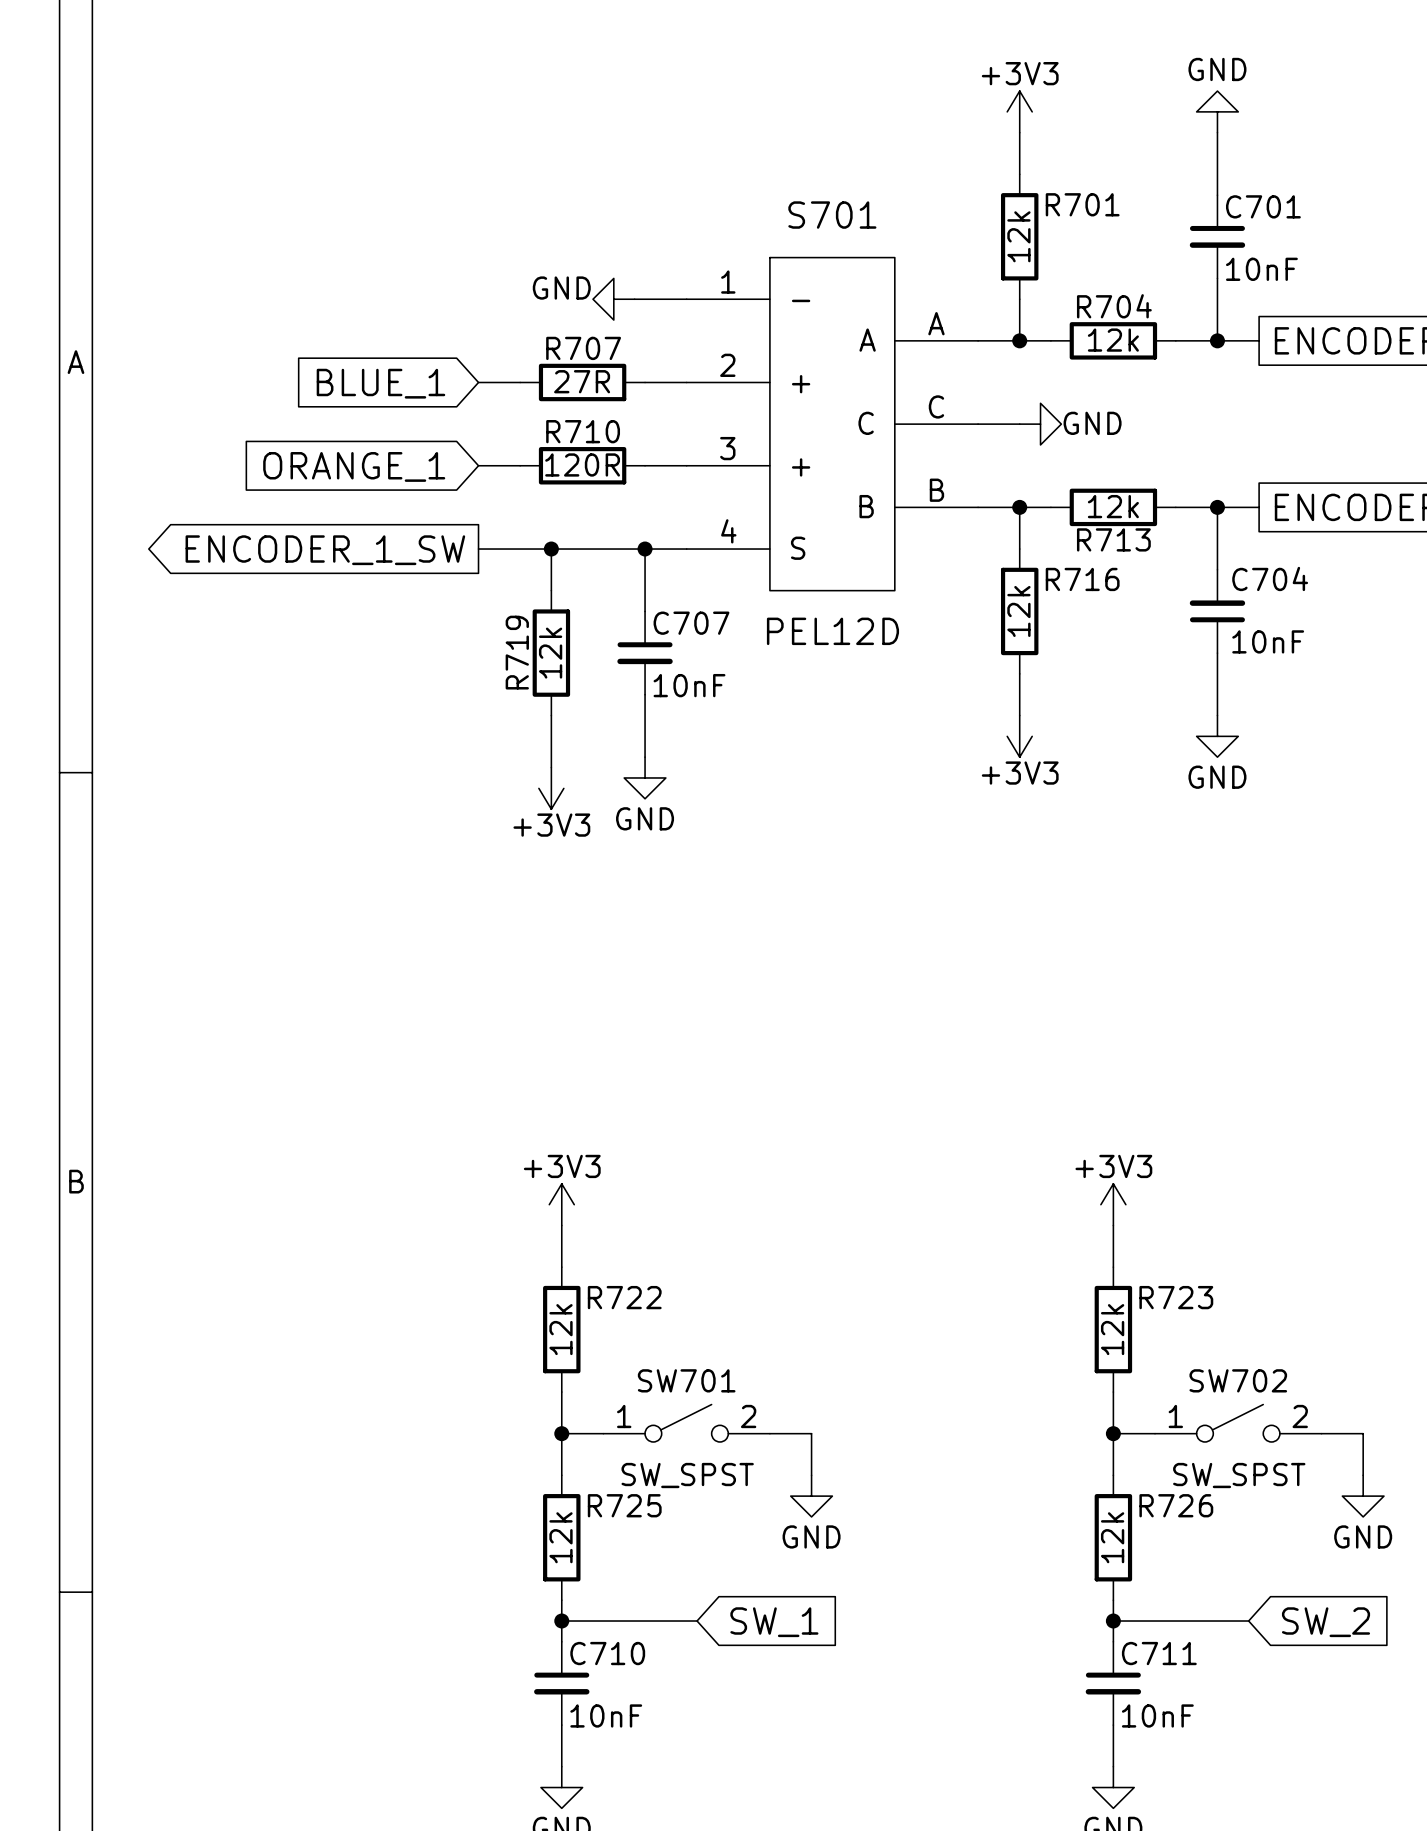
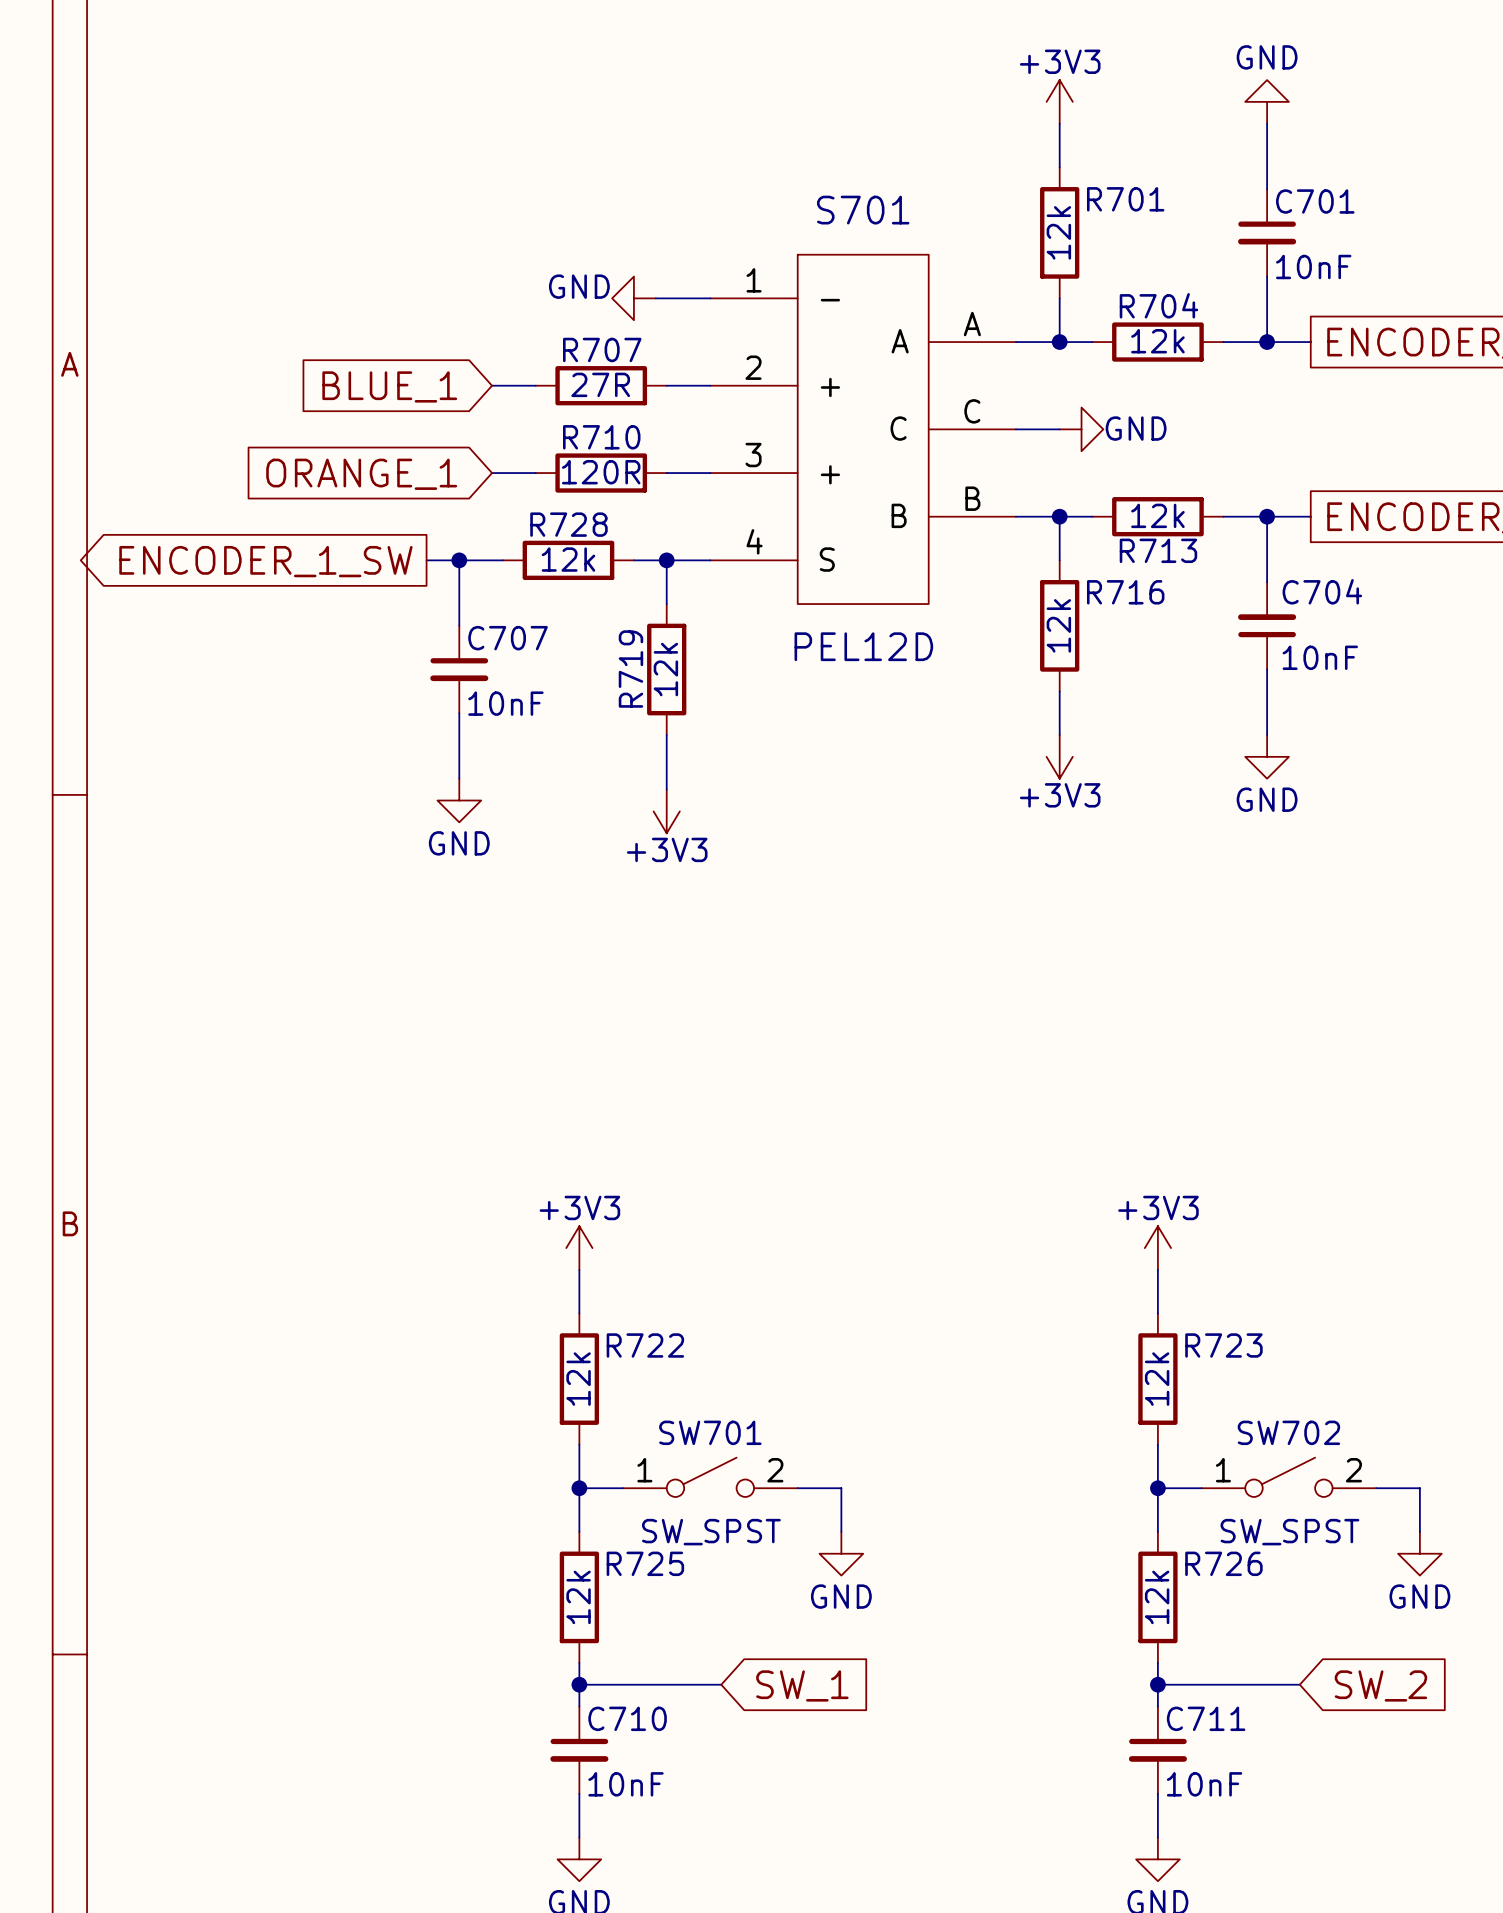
wire: none -> (426, 560) (492, 560)
wire: none -> (459, 560) (459, 625)
junction: none -> (459, 560)
wire: (488, 549) (613, 549) -> none
wire: (551, 549) (551, 590) -> none
R728: none -> 12k (568, 560)
junction: (551, 549) -> none
global label position: ENCODER_1_SW (325, 550) -> ENCODER_1_SW (265, 561)
R719 position: (551, 653) -> (666, 669)
C707 position: (645, 653) -> (459, 669)
wire: none -> (459, 713) (459, 778)
wire: (551, 715) (551, 767) -> none
power symbol: none -> GND (459, 800)
power symbol: GND (645, 777) -> +3V3 (666, 811)
power symbol: +3V3 (551, 788) -> none

